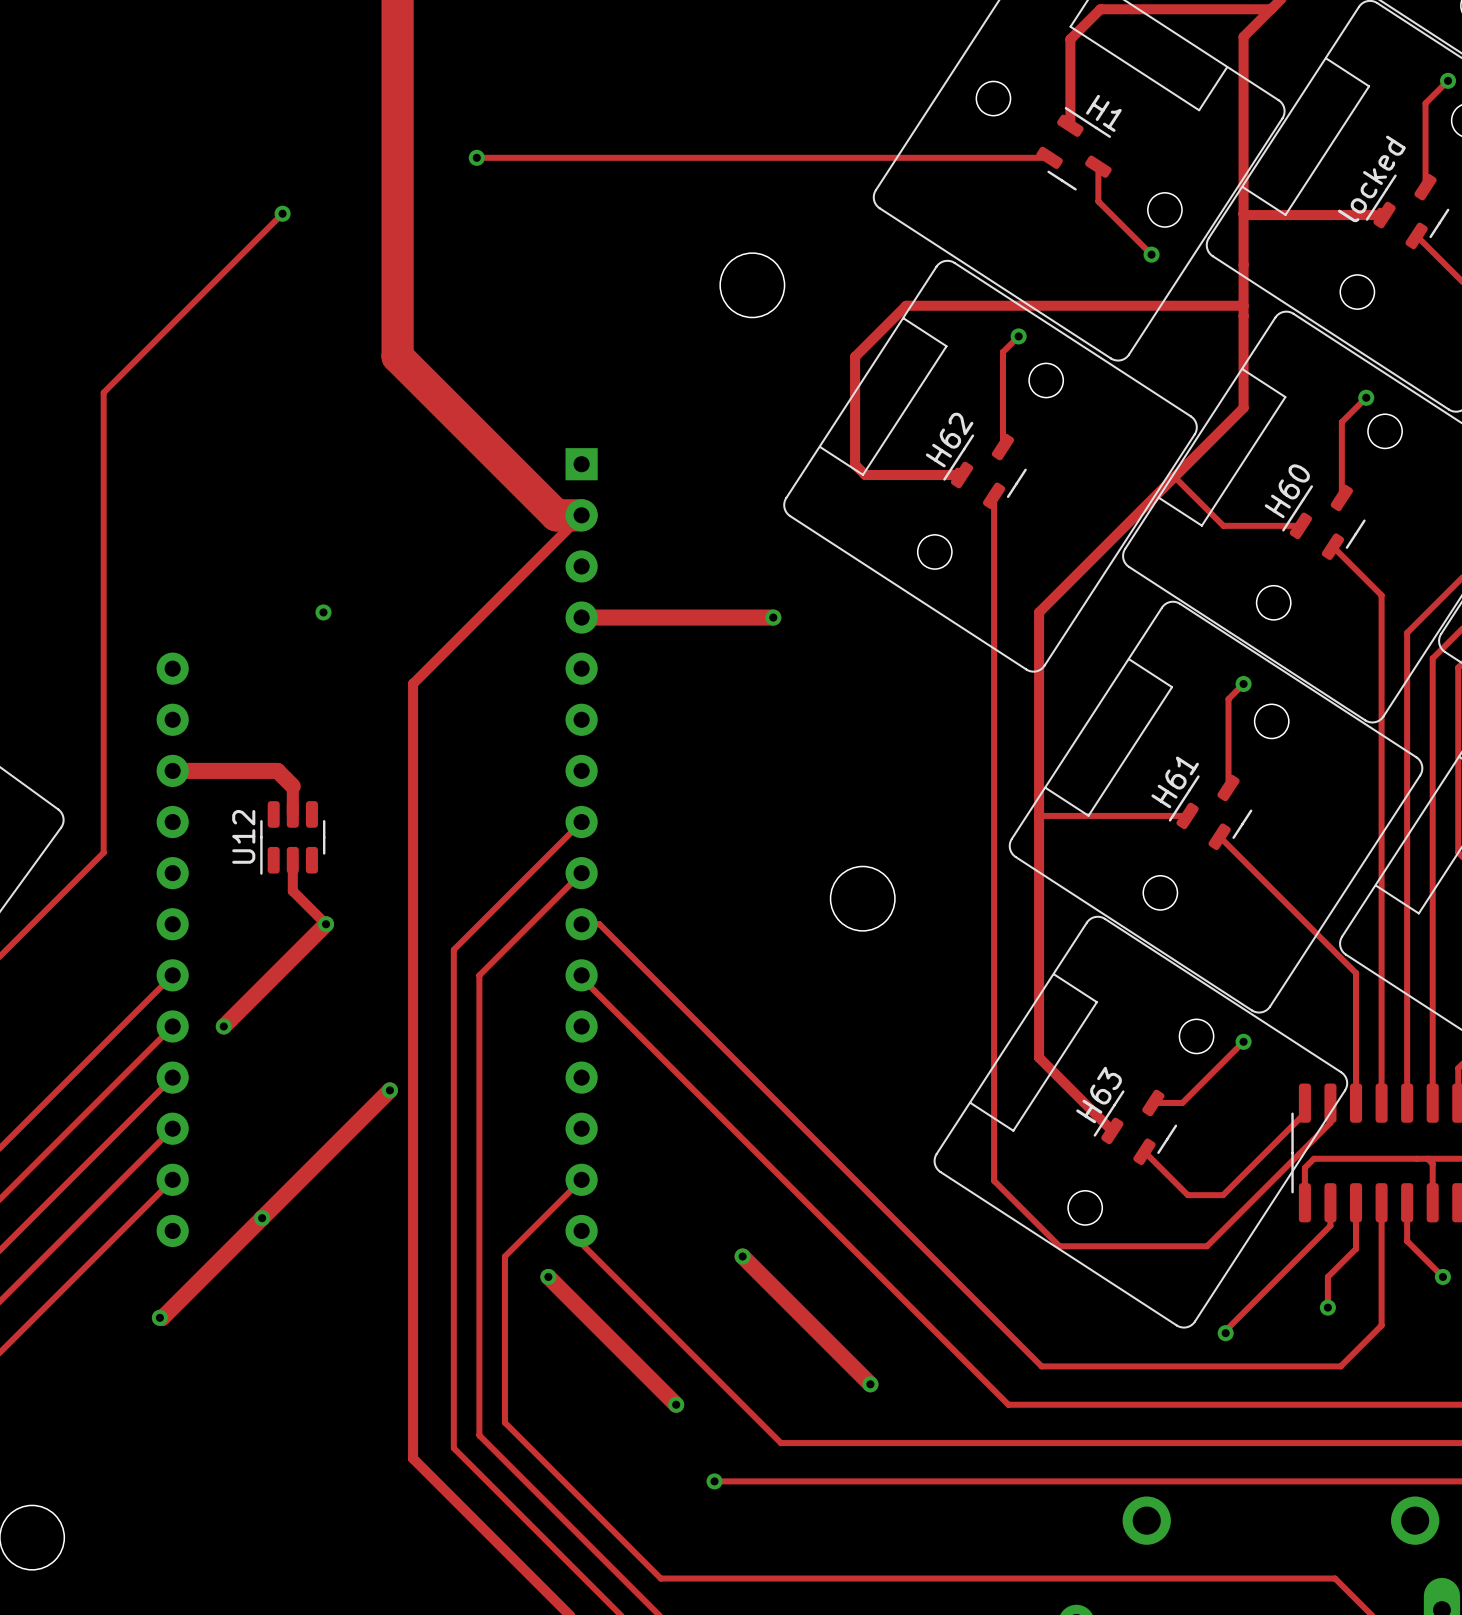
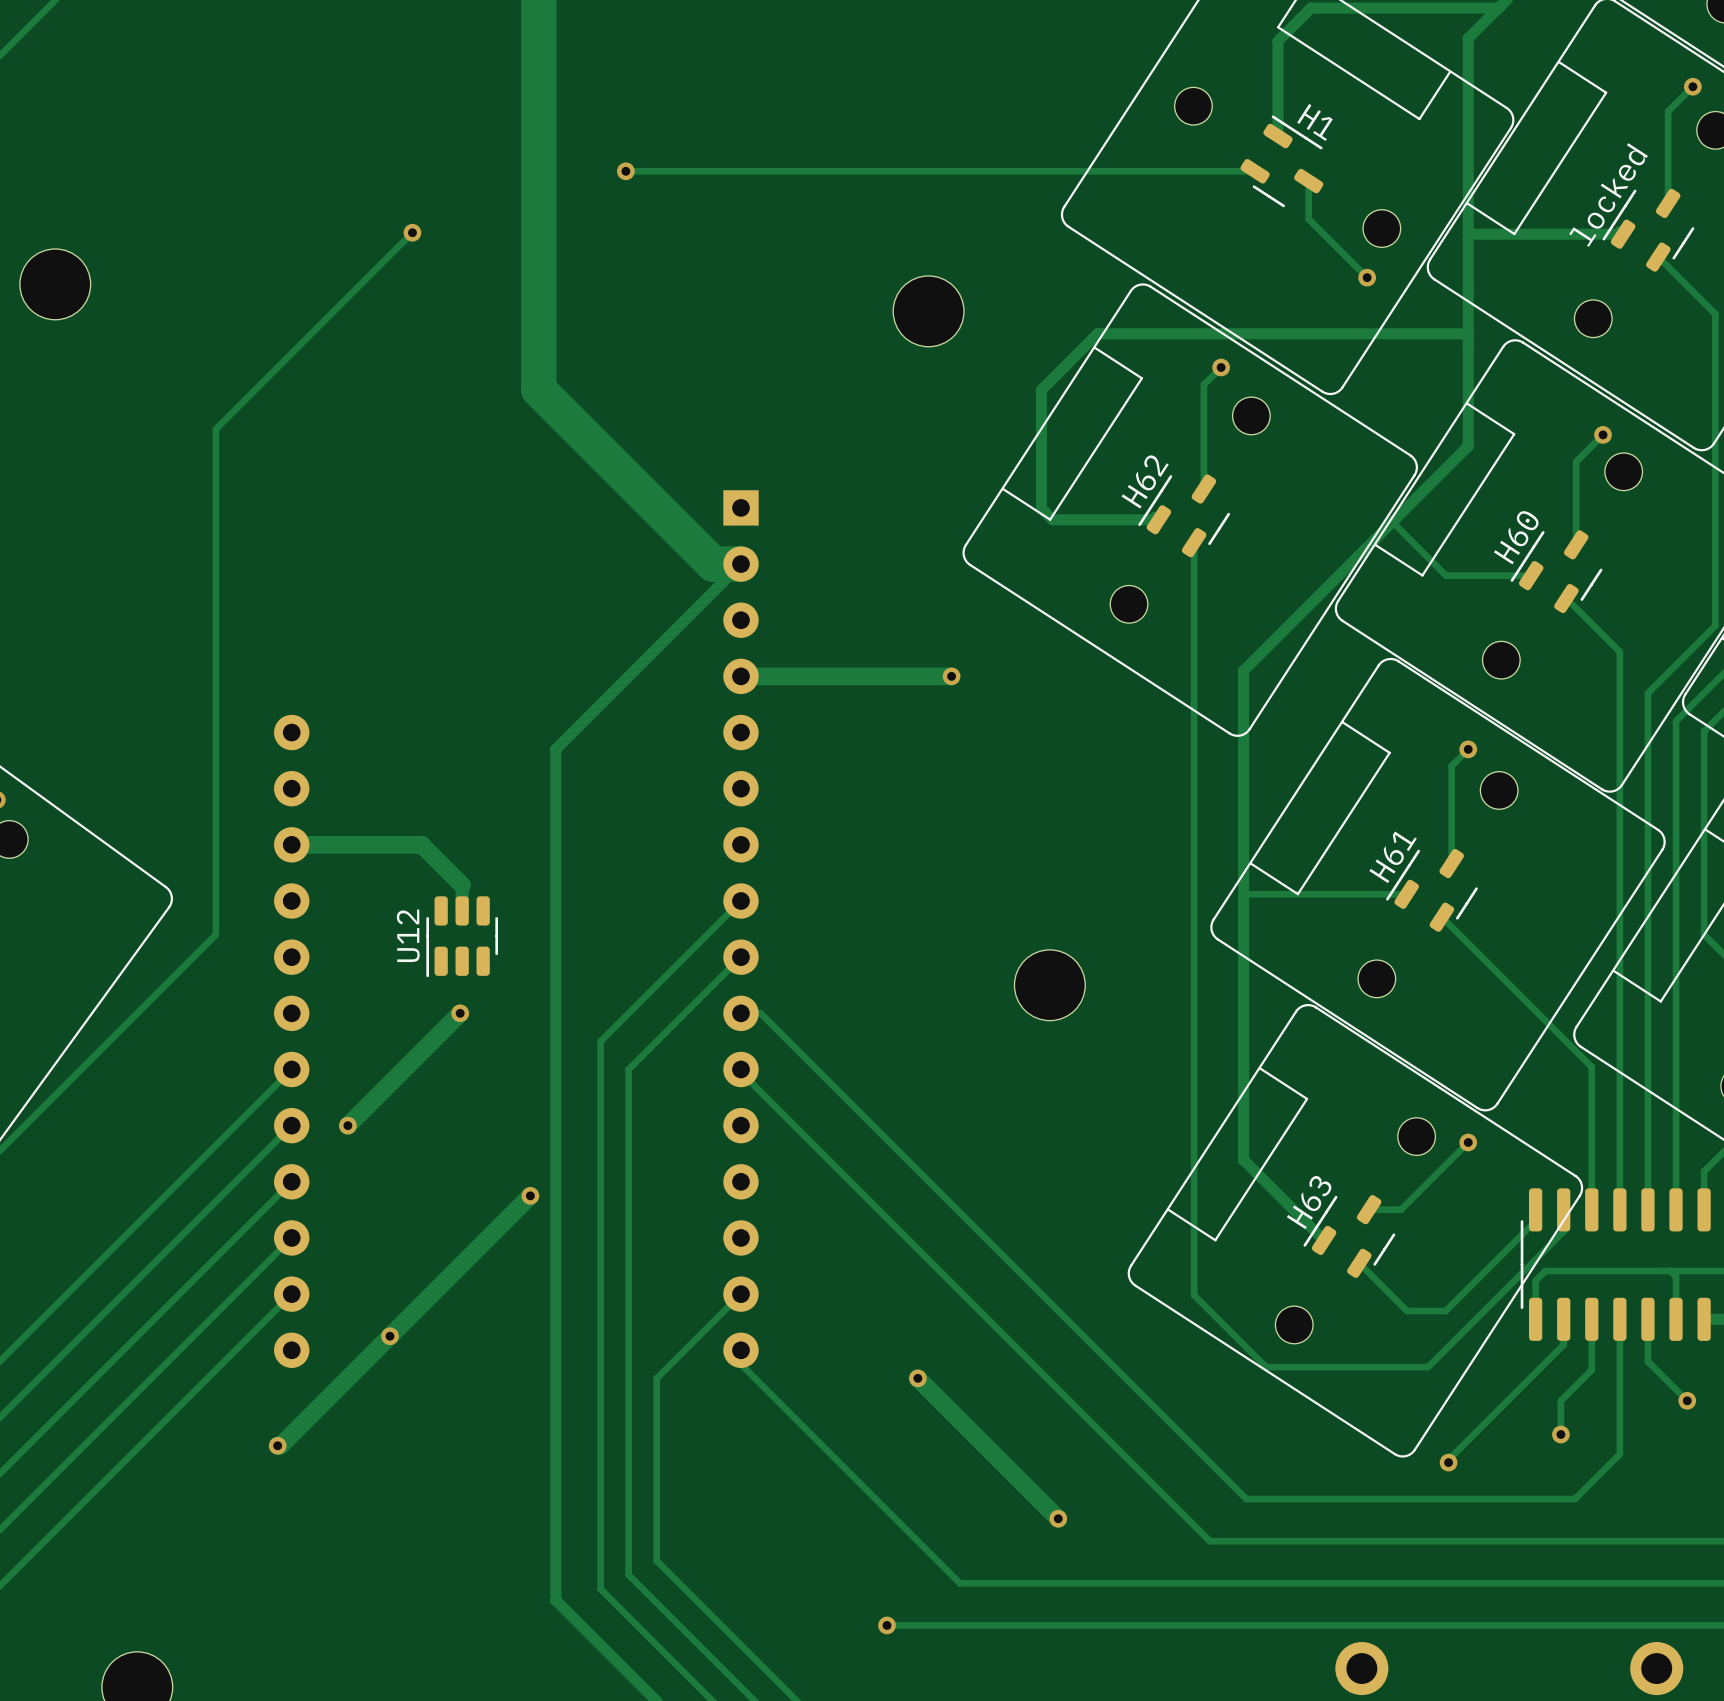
via: (323, 612) -> none
track: (277, 770) (292, 786) (292, 814) -> (406, 844) (421, 844) (462, 885) (462, 910)
U12 position: (292, 837) -> (462, 936)
track: (292, 860) (292, 891) (326, 924) -> none
track: (548, 1276) (676, 1404) -> none
via: (548, 1276) -> none
via: (676, 1404) -> none

